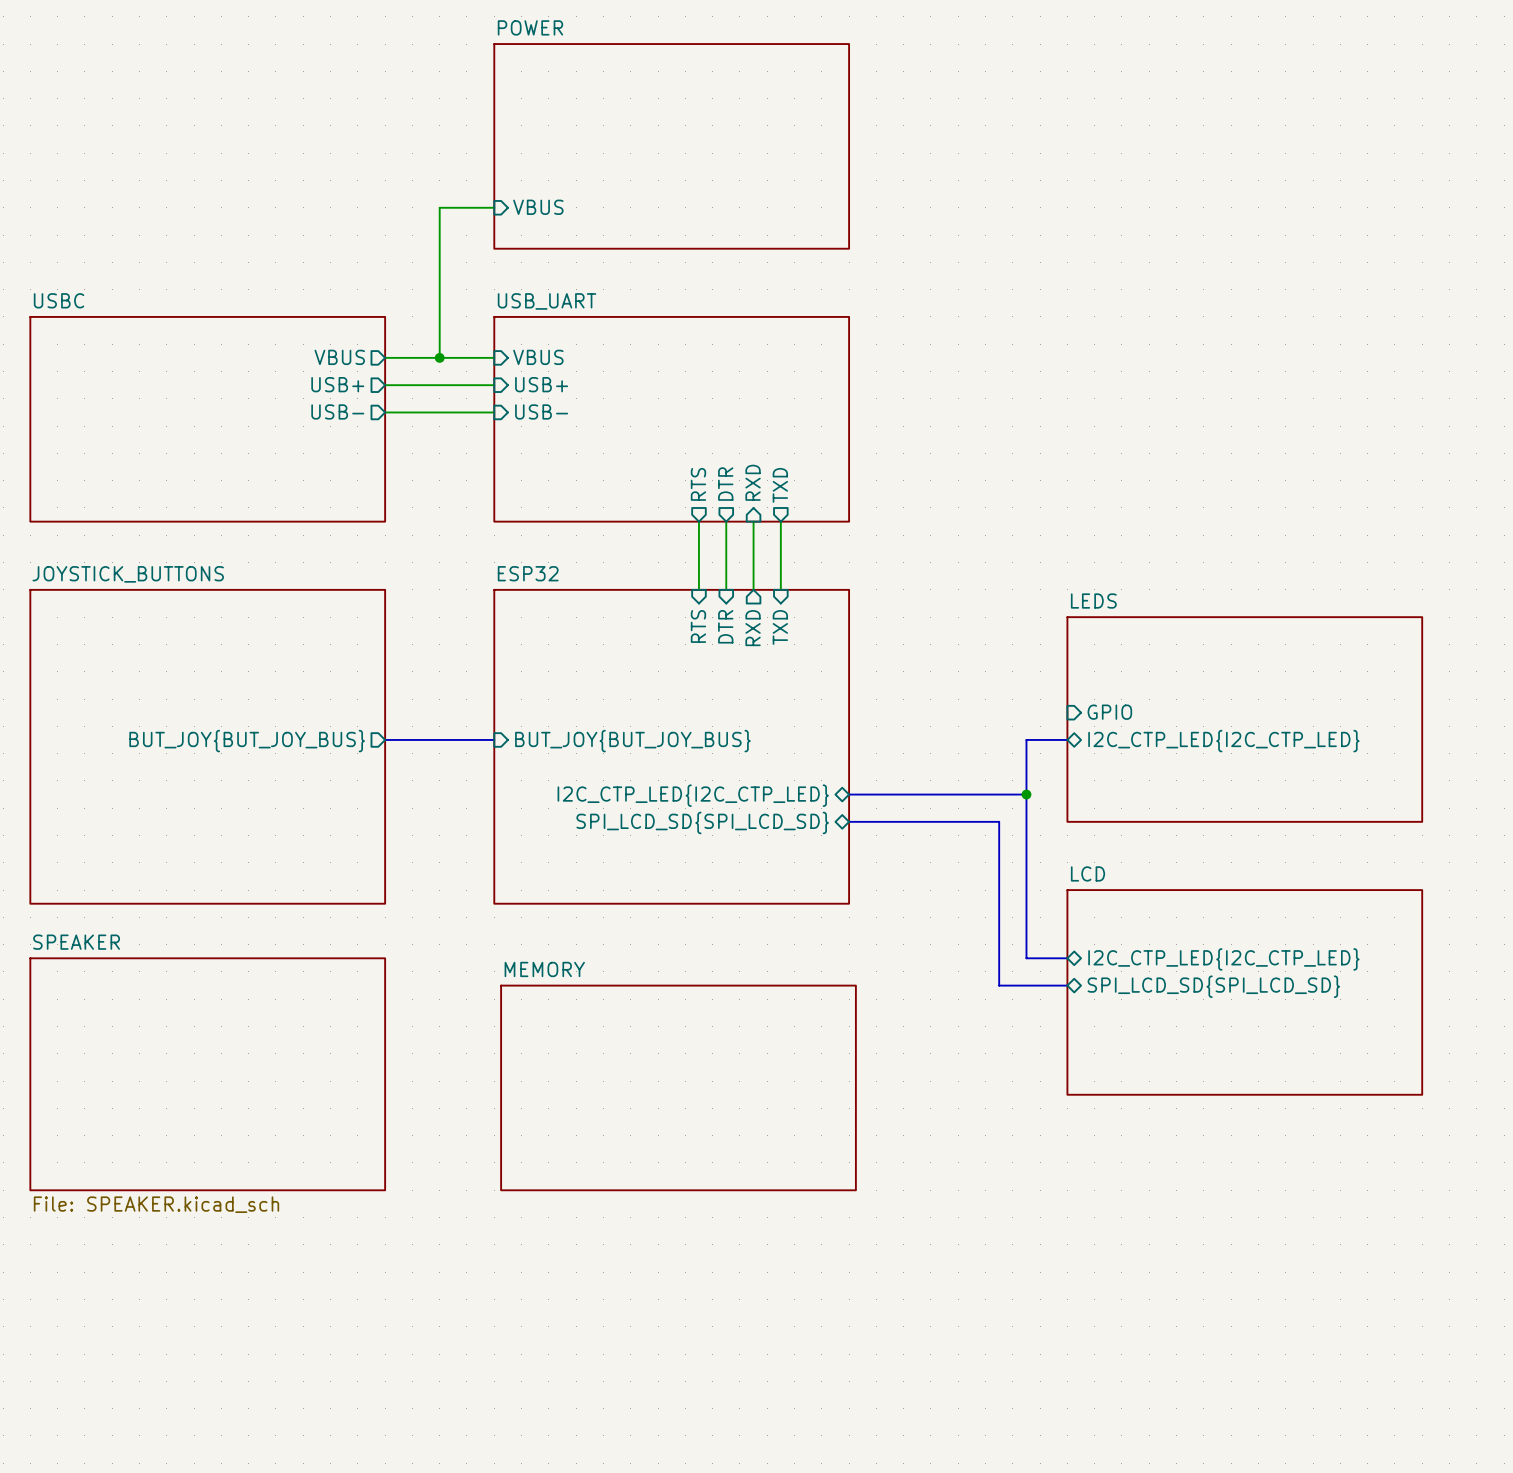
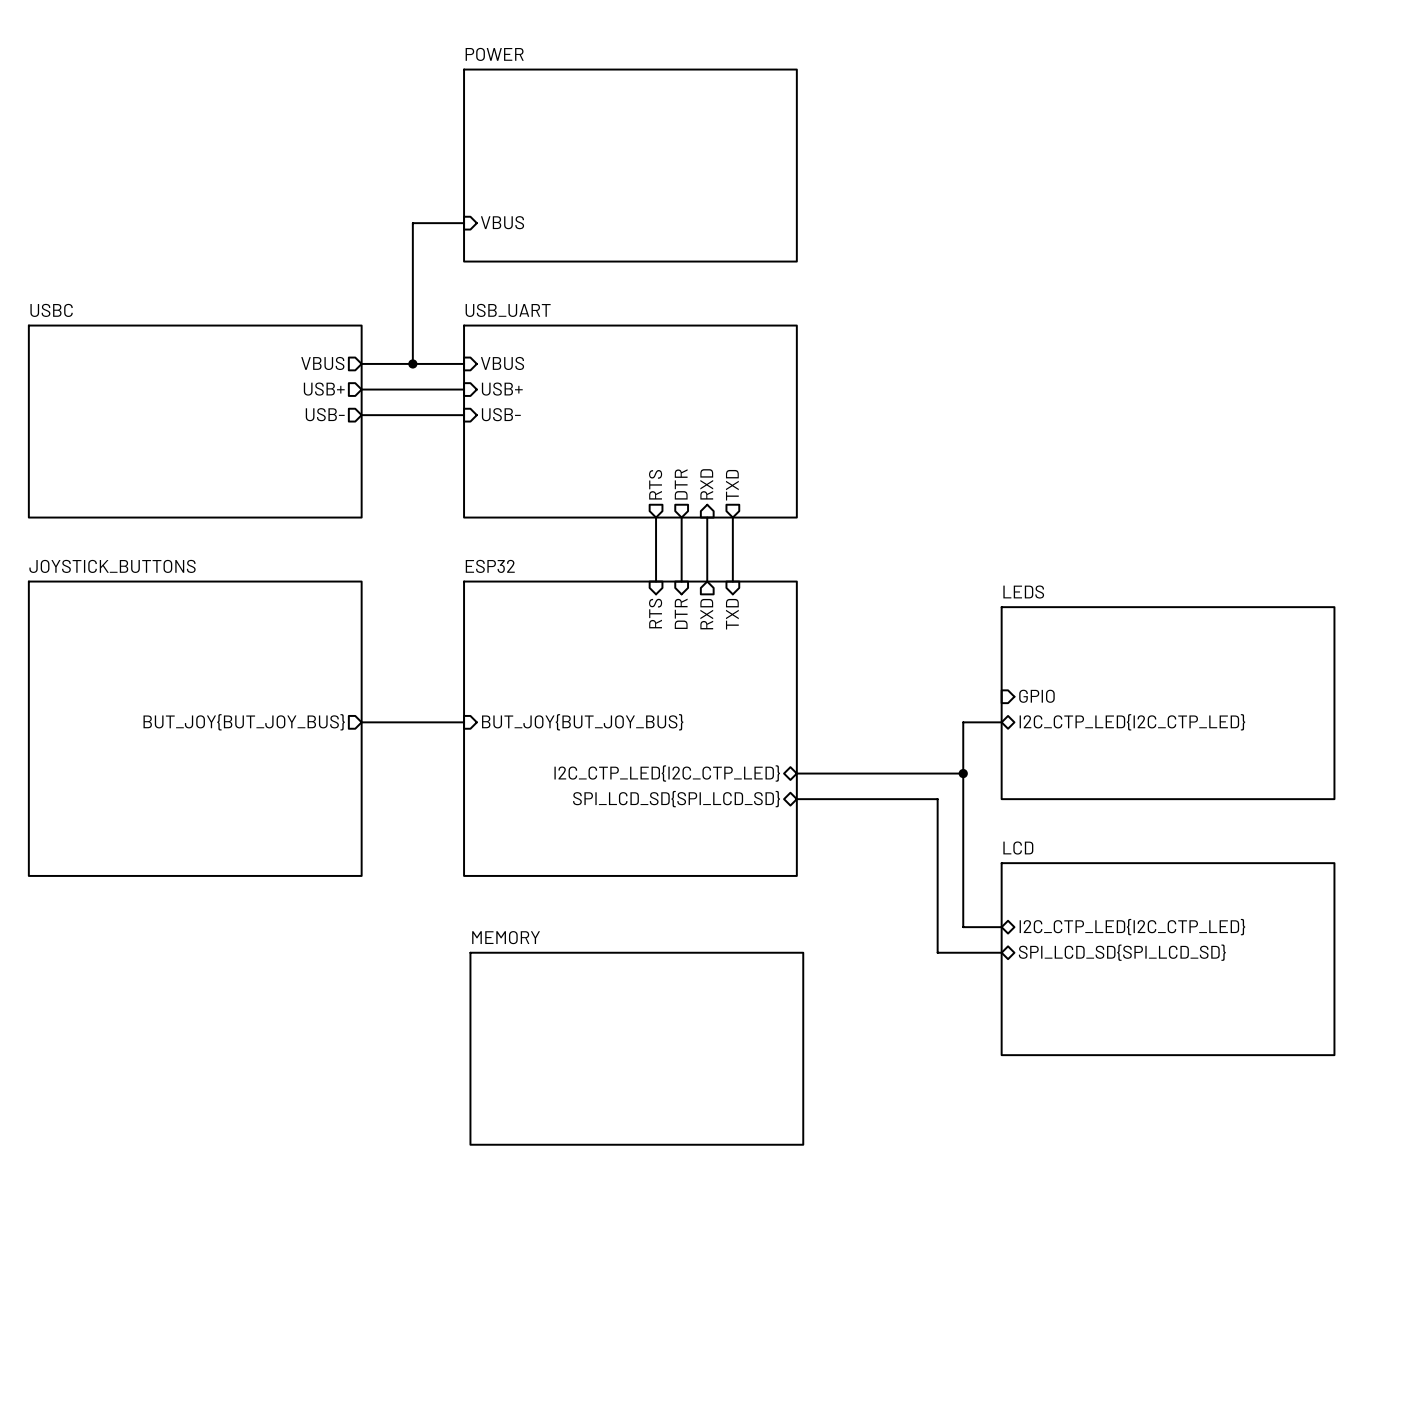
sheet SPEAKER: File: SPEAKER.kicad_sch (207, 1074) -> none

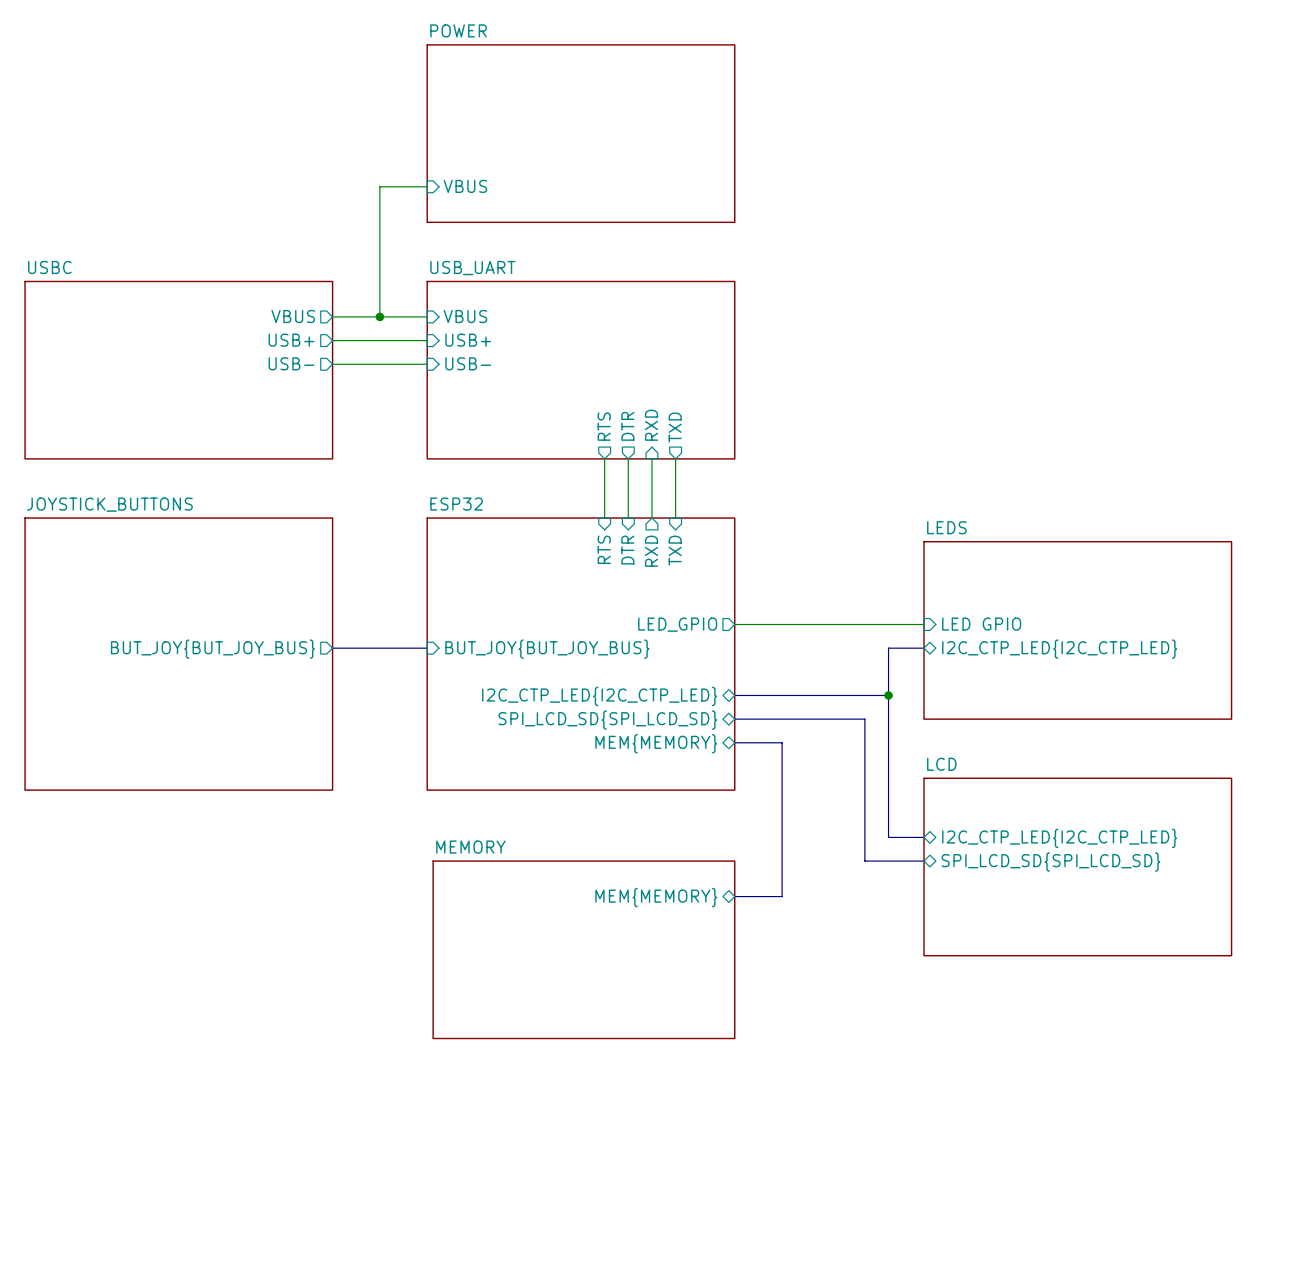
sheet pin: none -> LED_GPIO (677, 624)
wire: none -> (734, 624) (924, 624)
sheet pin: GPIO (1036, 696) -> LED GPIO (981, 624)
sheet pin: none -> MEM{MEMORY} (656, 743)
bus: none -> (734, 742) (782, 742) (782, 896) (734, 896)
sheet MEMORY shape: [469, 951, 805, 1146] -> [432, 860, 736, 1040]
sheet pin: none -> MEM{MEMORY} (656, 897)

